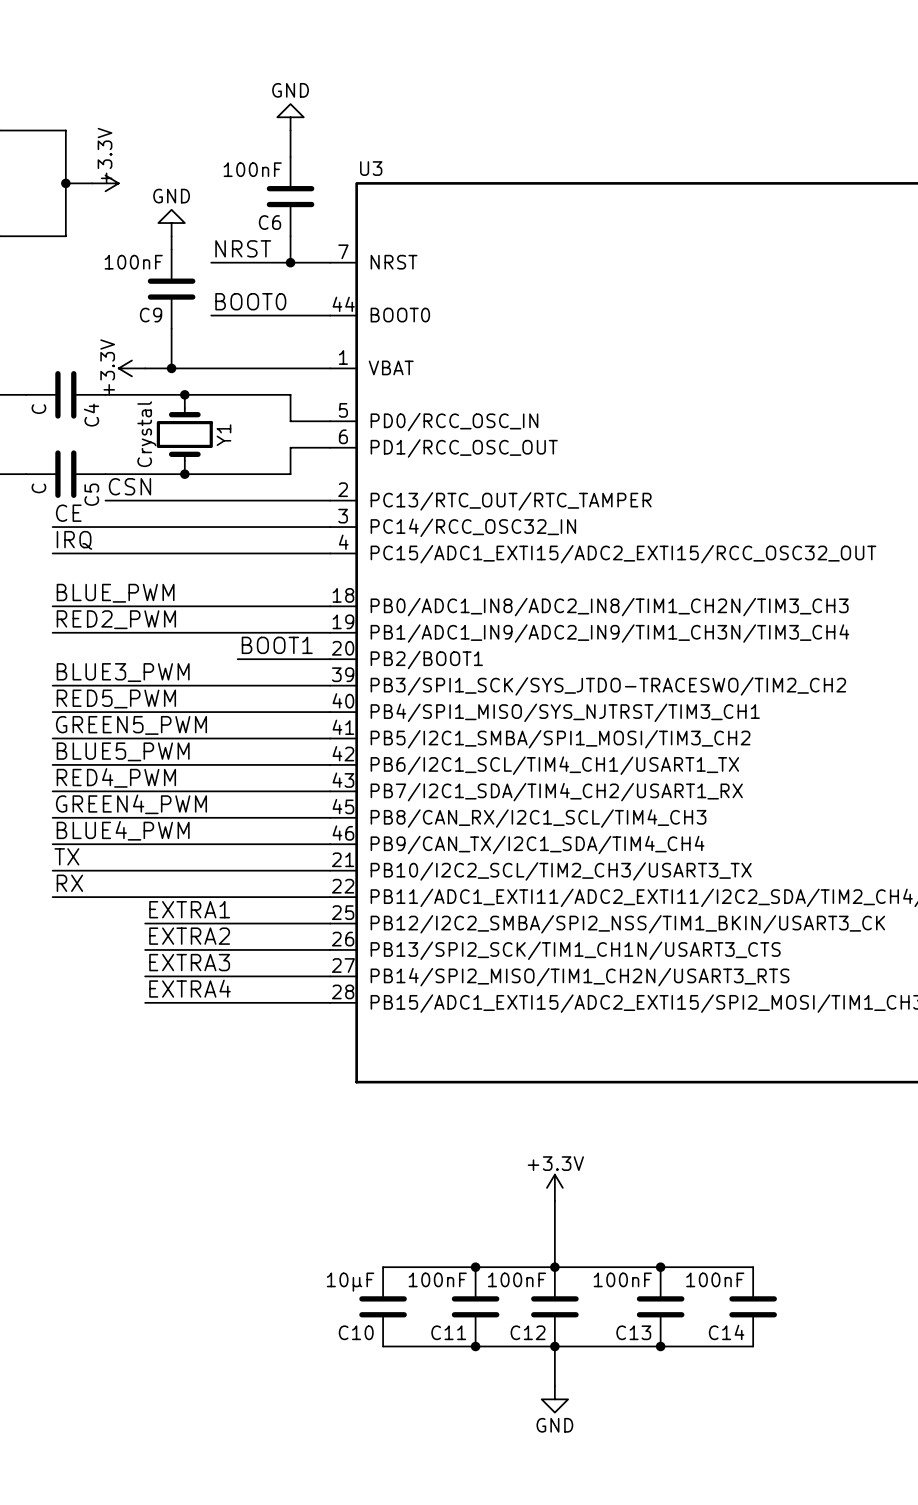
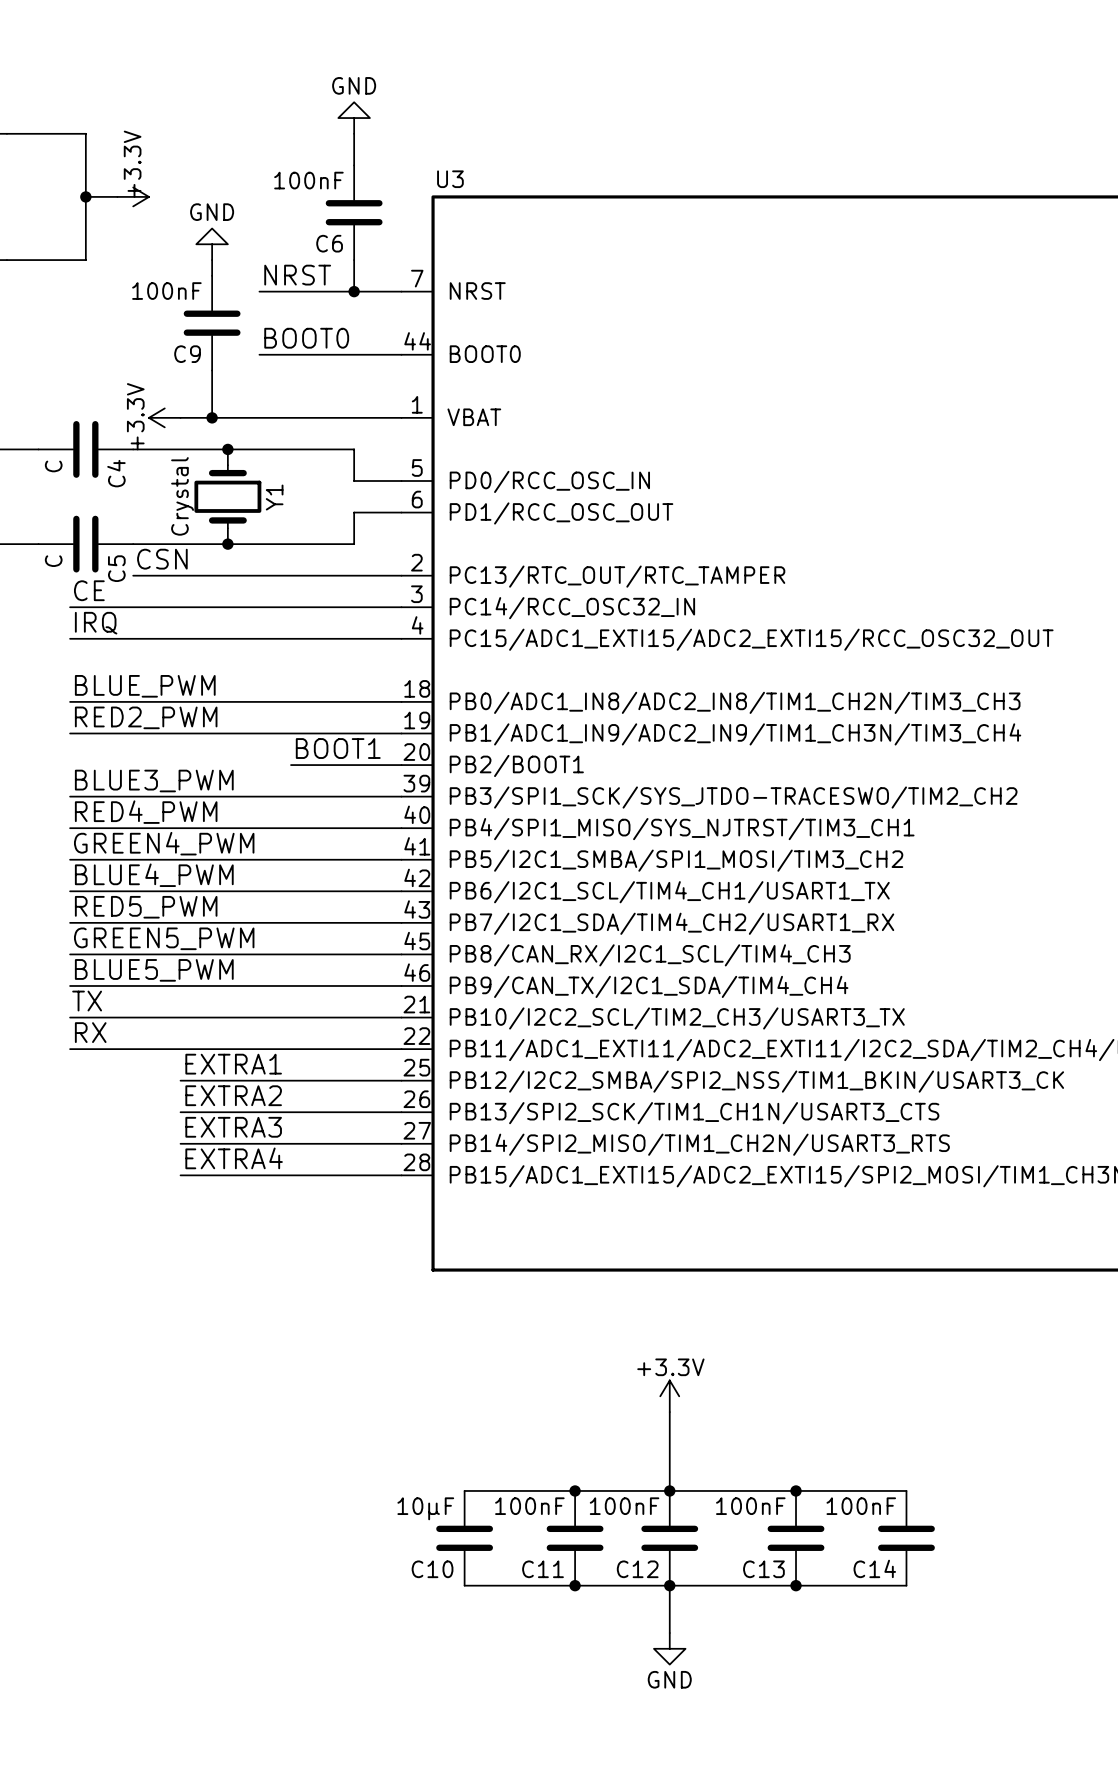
label: RED5_PWM (116, 698) -> RED4_PWM (146, 812)
label: GREEN5_PWM (131, 725) -> GREEN4_PWM (164, 843)
label: BLUE5_PWM (123, 751) -> BLUE4_PWM (154, 875)
label: RED4_PWM (116, 777) -> RED5_PWM (146, 907)
label: GREEN4_PWM (131, 804) -> GREEN5_PWM (164, 938)
label: BLUE4_PWM (123, 830) -> BLUE5_PWM (154, 970)

